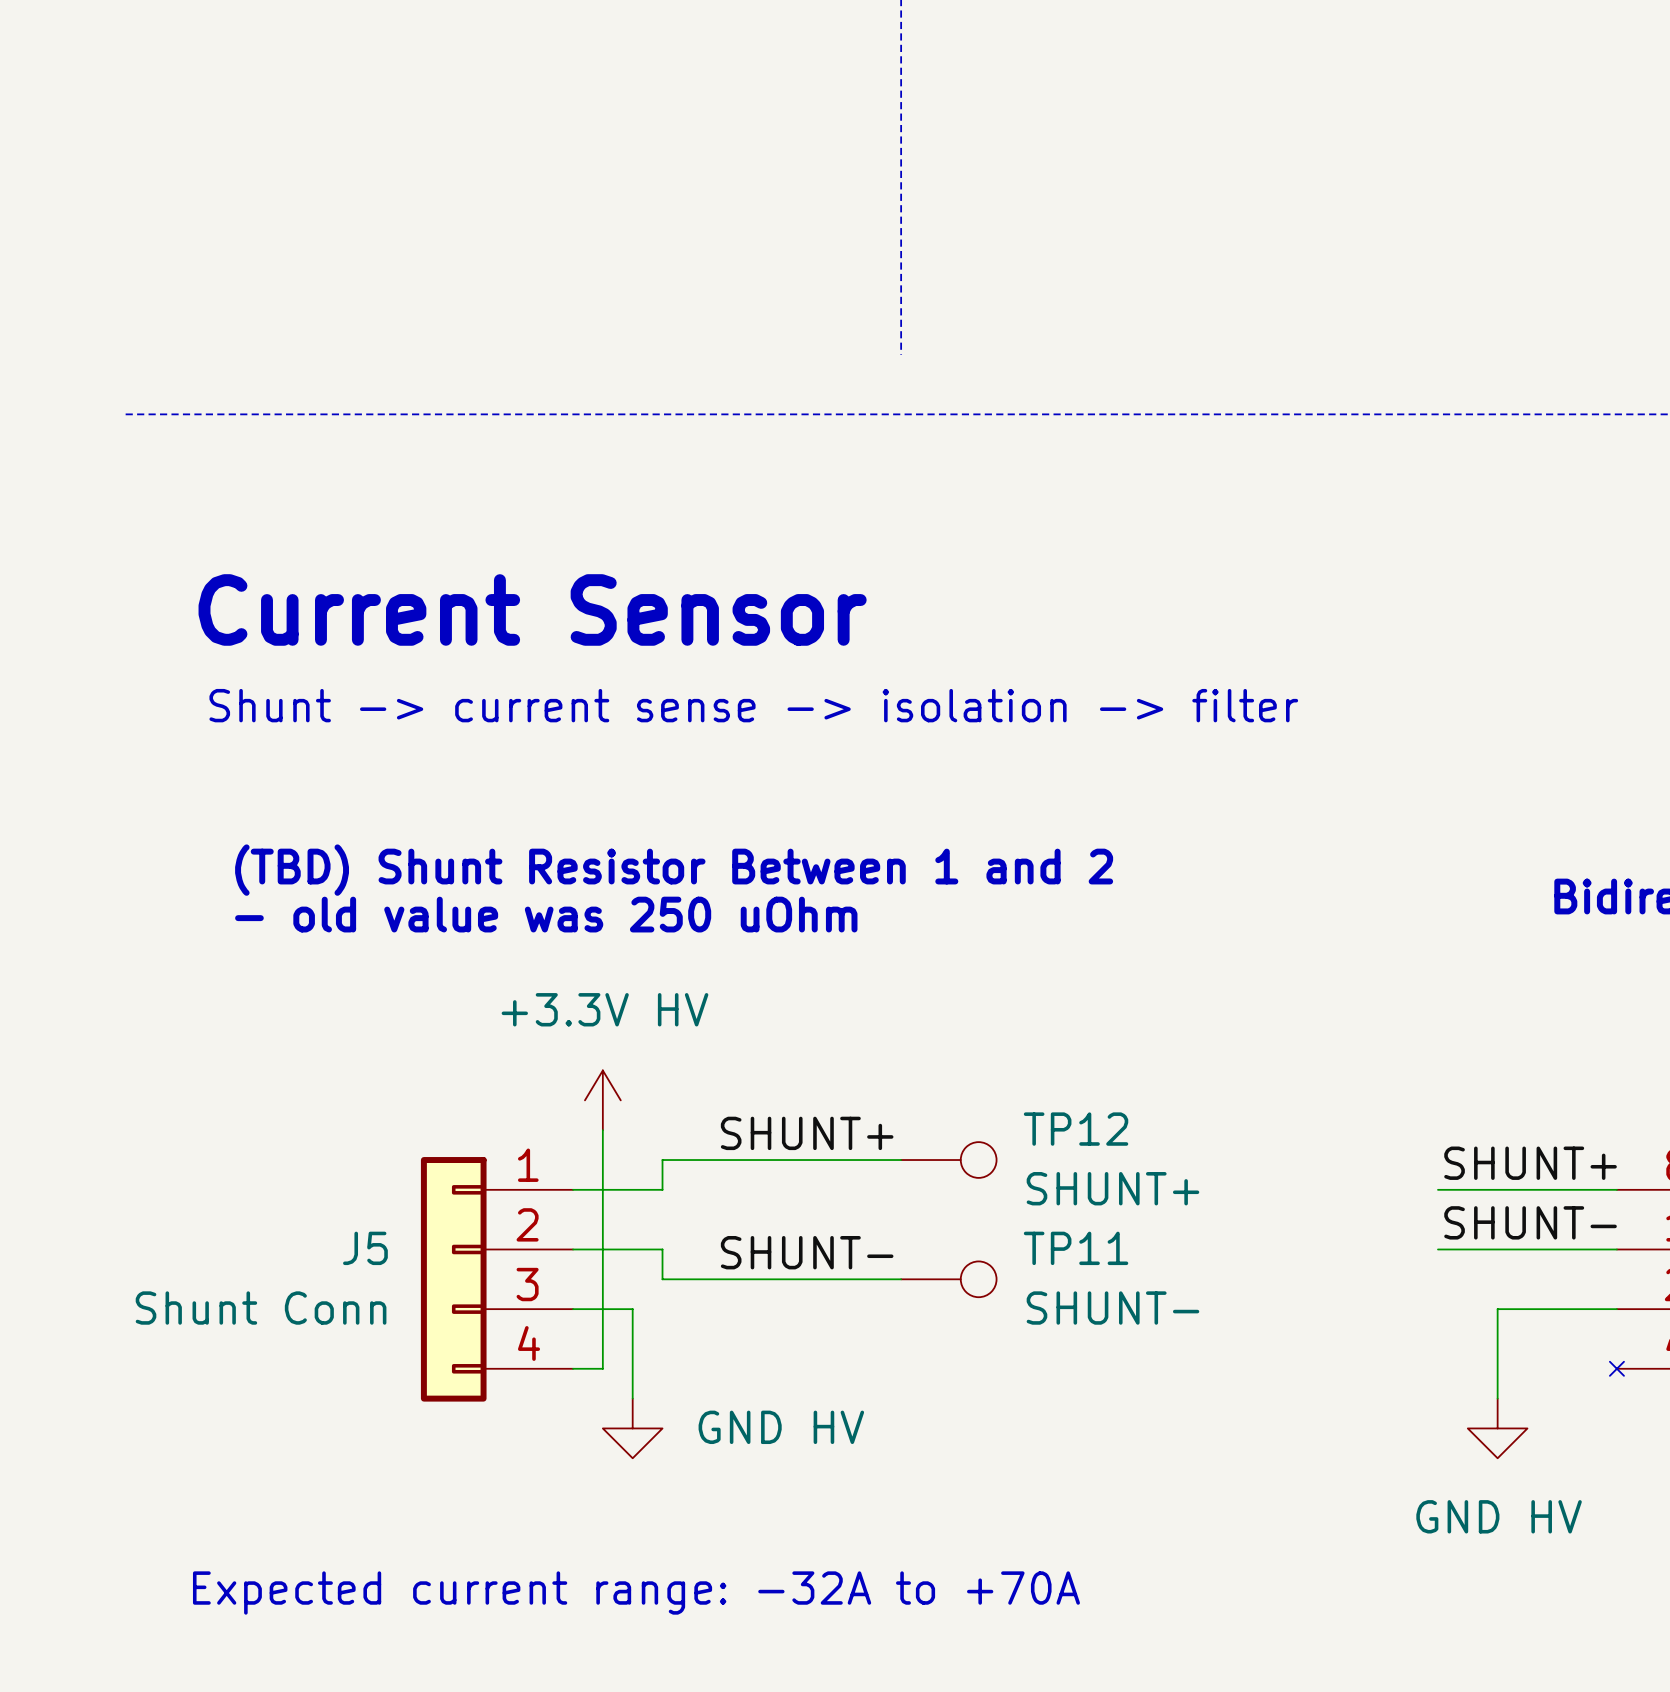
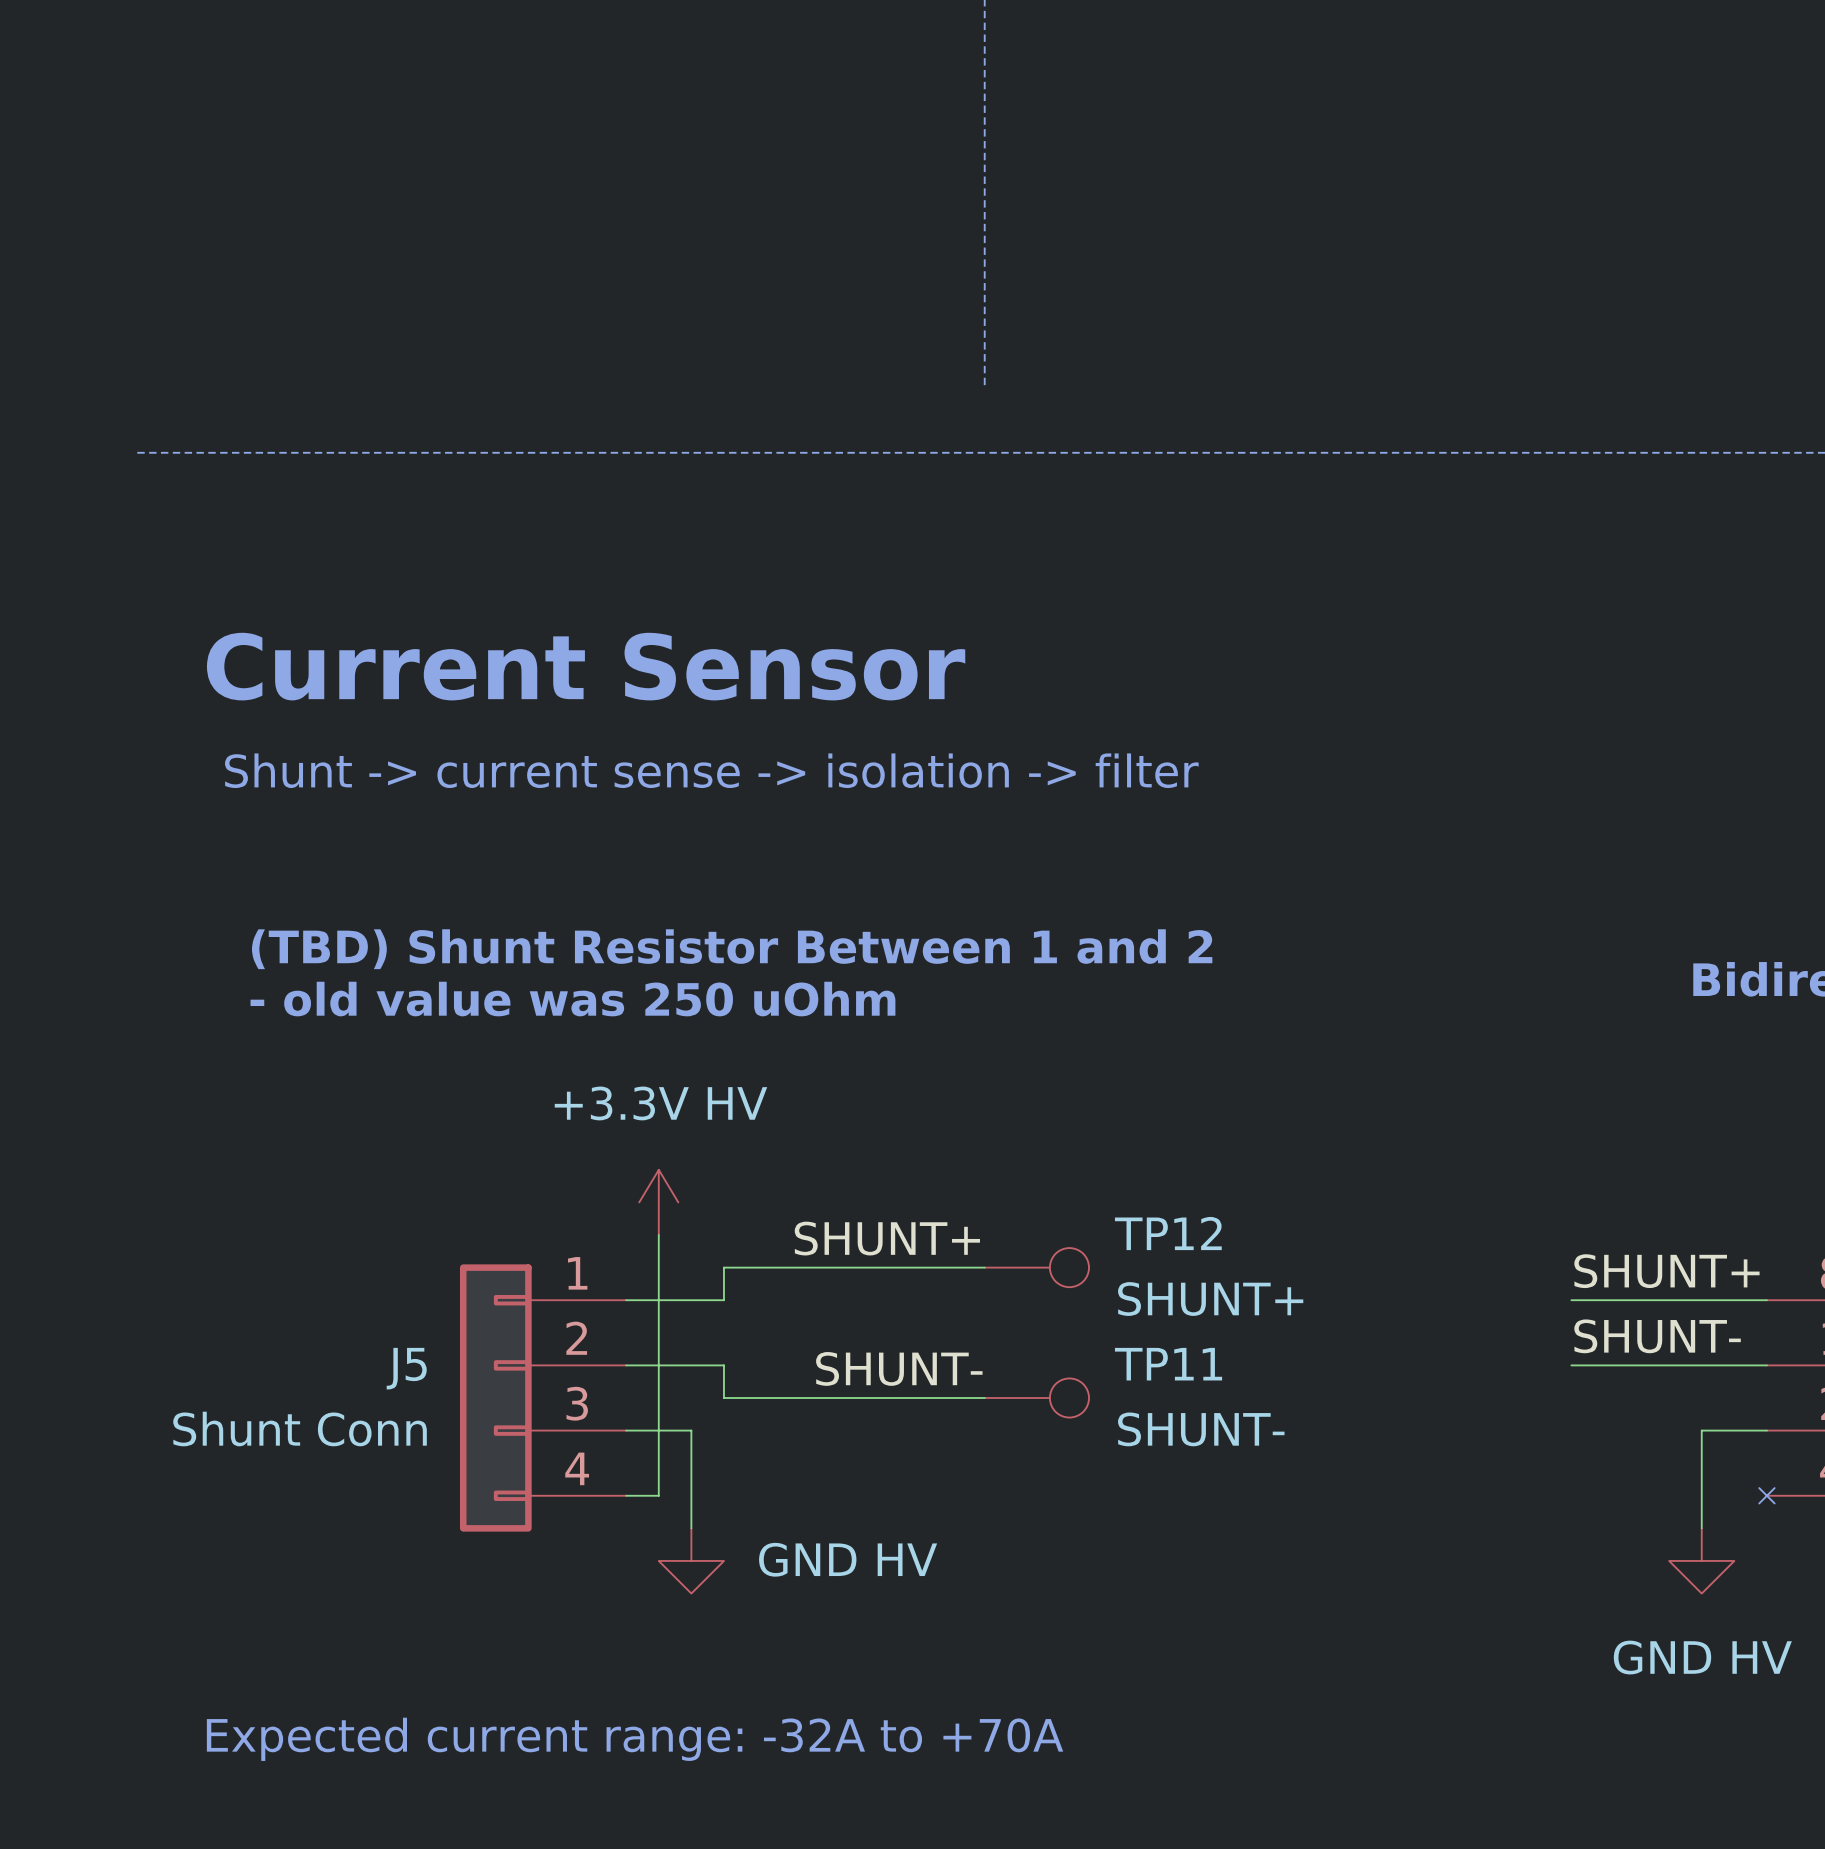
wire: (1557, 1309) (1497, 1309) (1497, 1398) -> (1701, 1430) (1701, 1528)
power symbol position: GND HV (1497, 1428) -> GND HV (1701, 1560)

